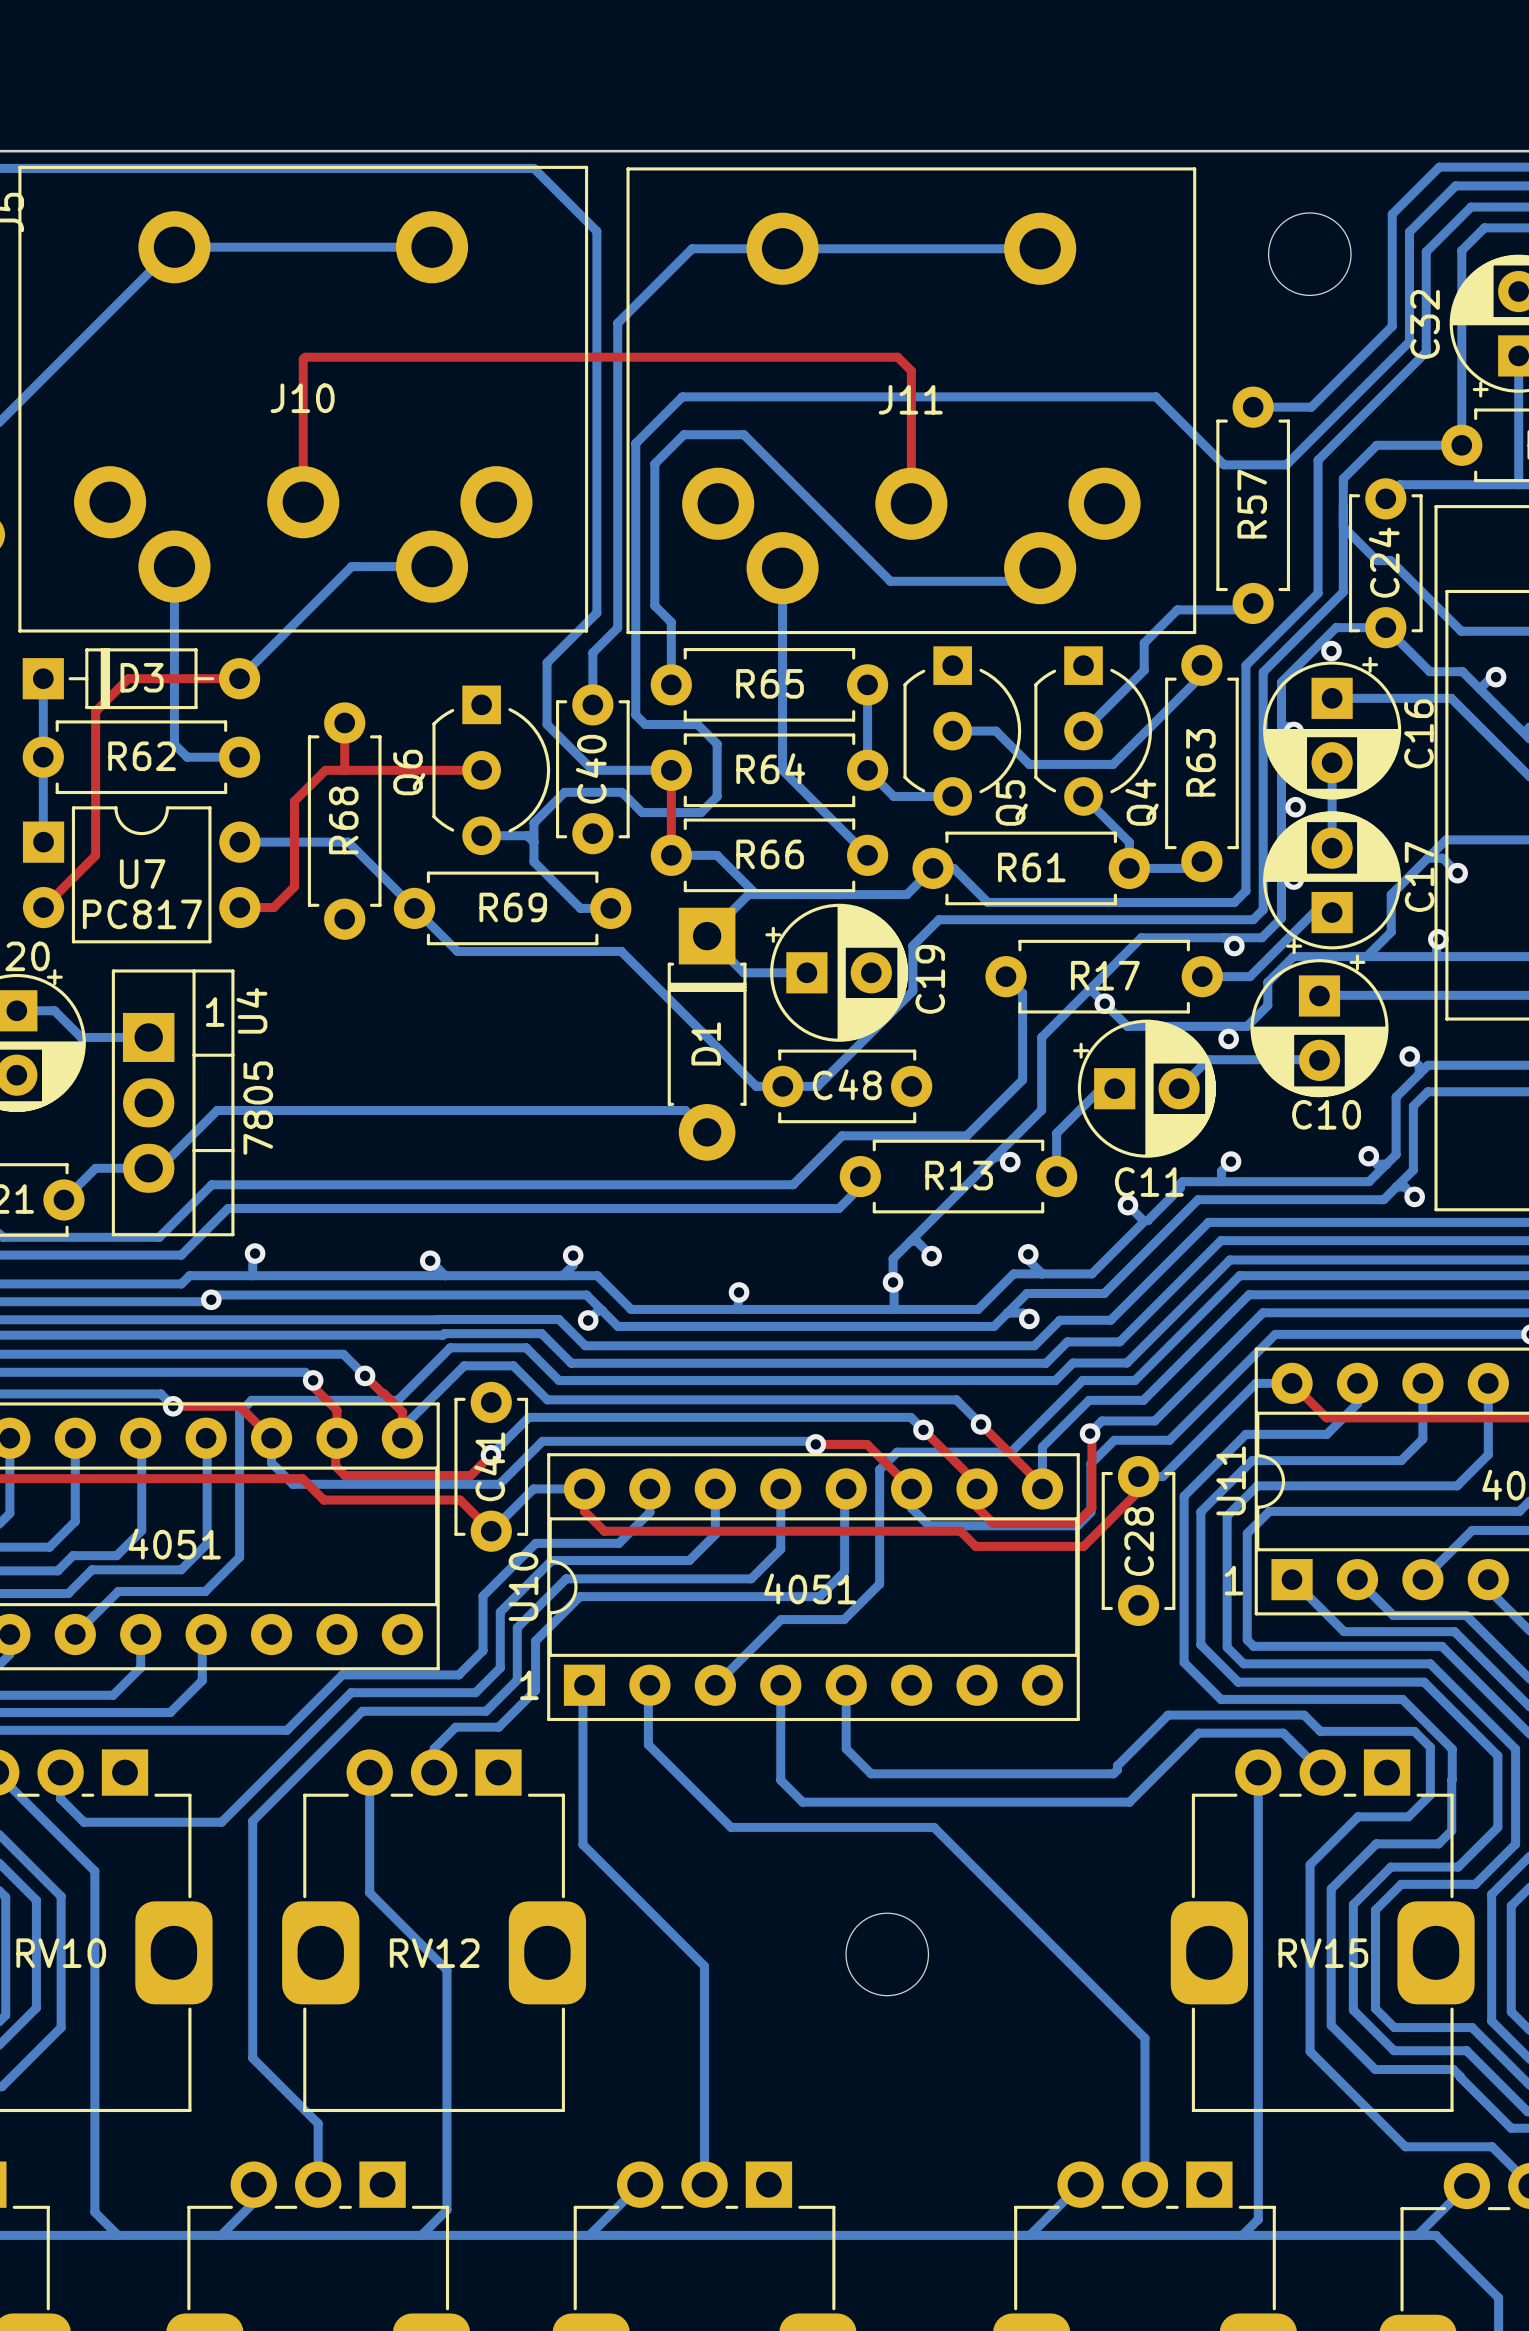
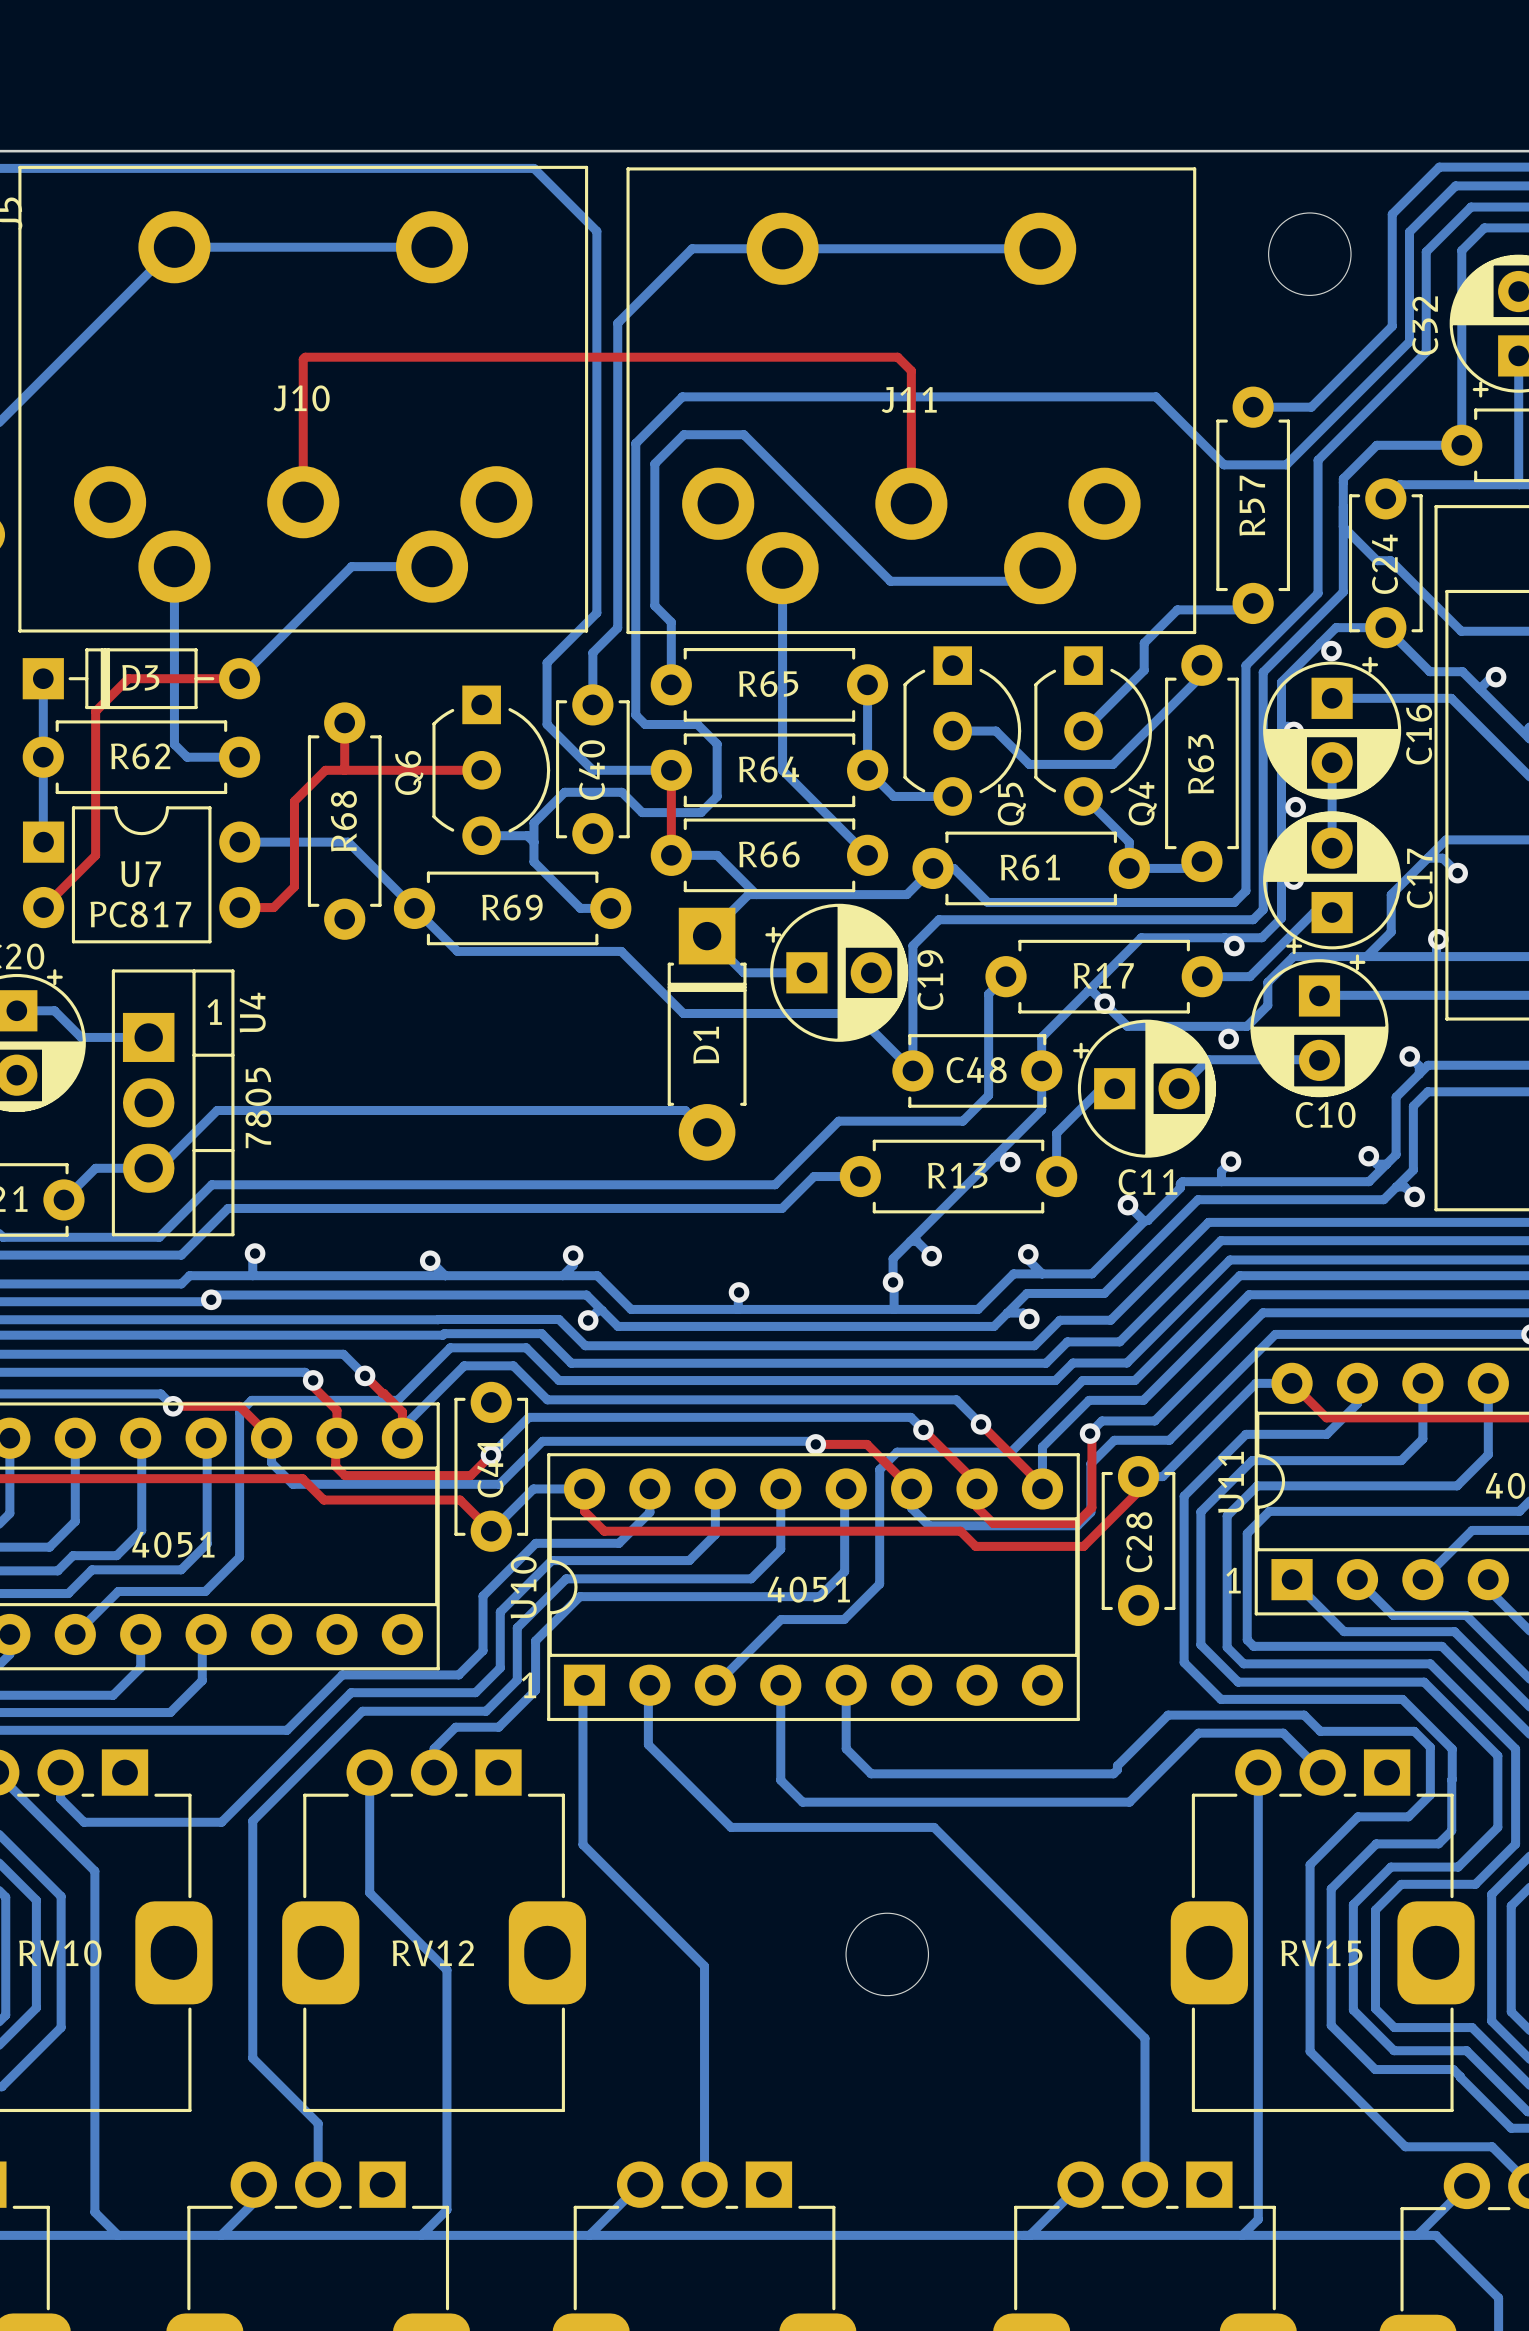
bottom track: (1006, 976) (1022, 993) (1022, 1079) (966, 1135) (842, 1135) (793, 1184) (775, 1184) -> (1006, 976) (988, 994) (988, 1095) (962, 1121) (838, 1121) (775, 1184)
bottom track: (912, 991) (817, 1086) (756, 1086) (683, 1013) -> (912, 991) (912, 1070) (855, 1013) (683, 1013)
C48 position: (847, 1086) -> (977, 1070)
bottom track: (860, 1176) (860, 1187) (838, 1208) (782, 1208) -> (860, 1176) (814, 1176) (782, 1208)

